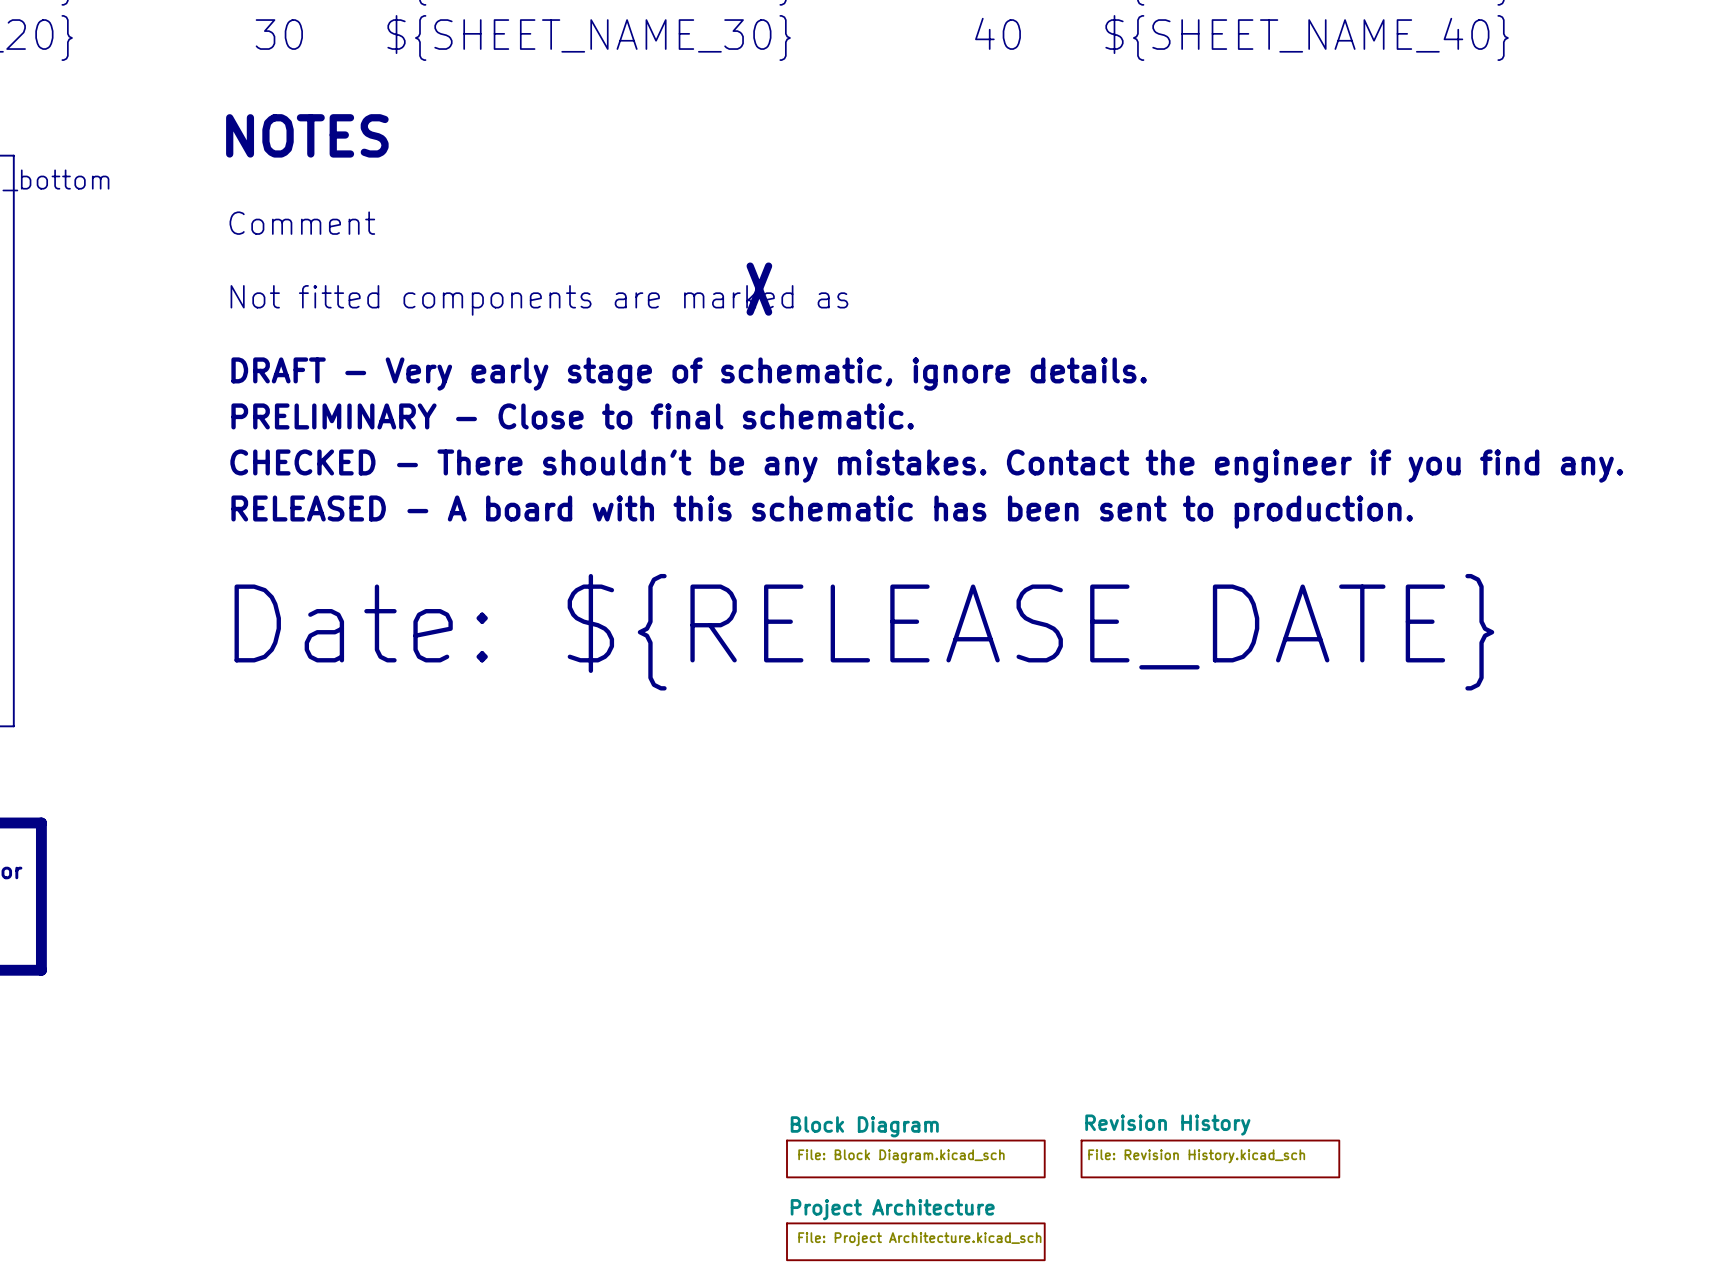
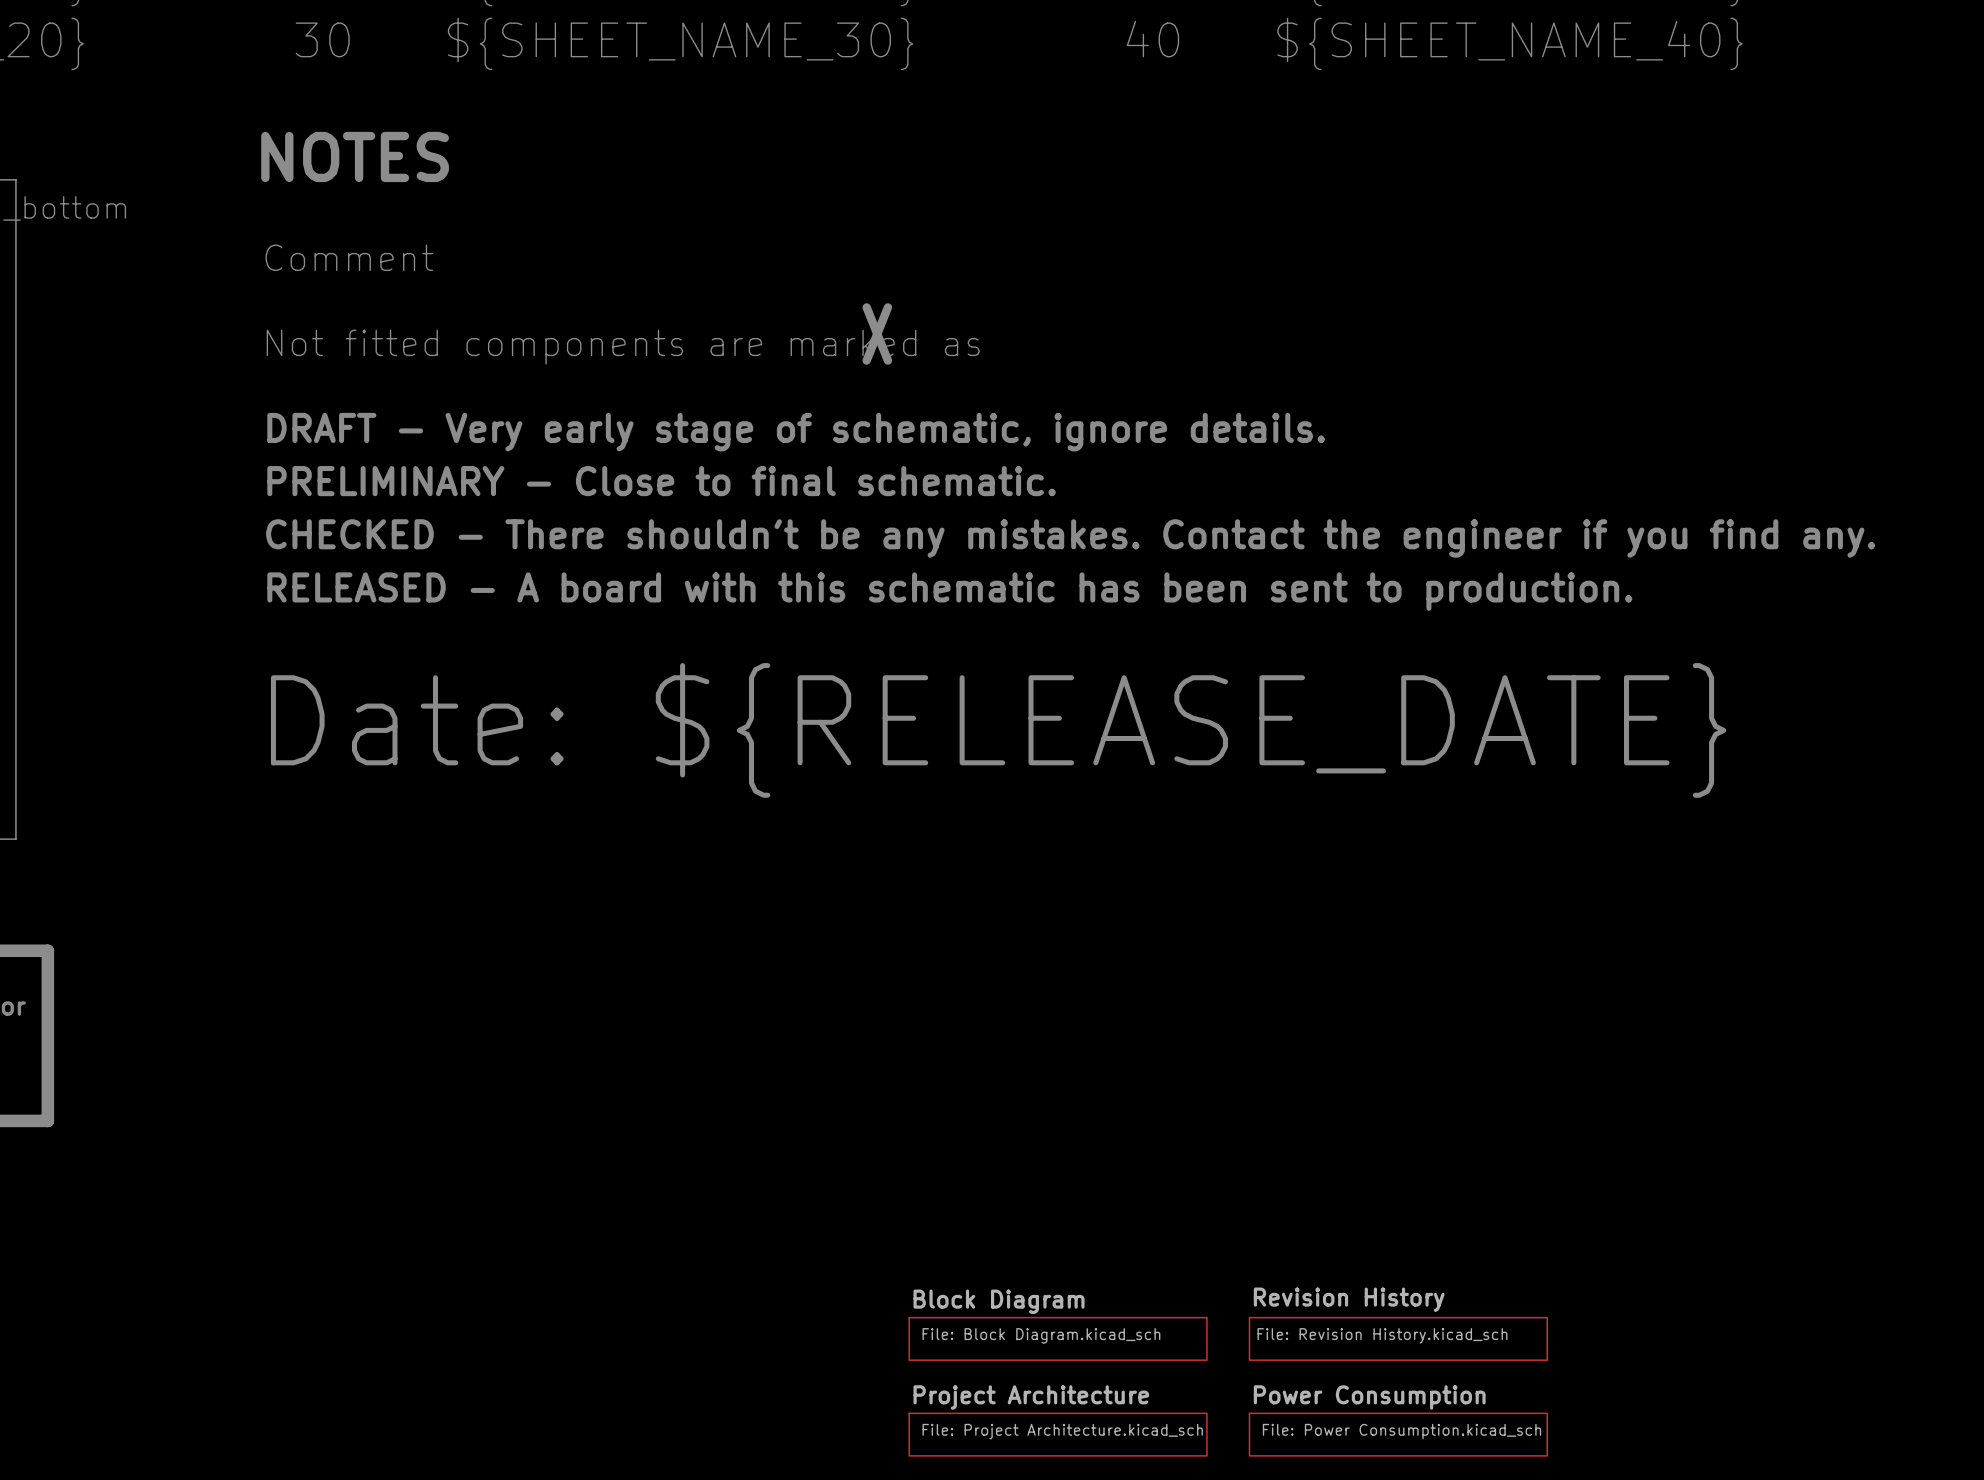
sheet Power Consumption: none -> File: Power Consumption.kicad_sch (1398, 1434)

